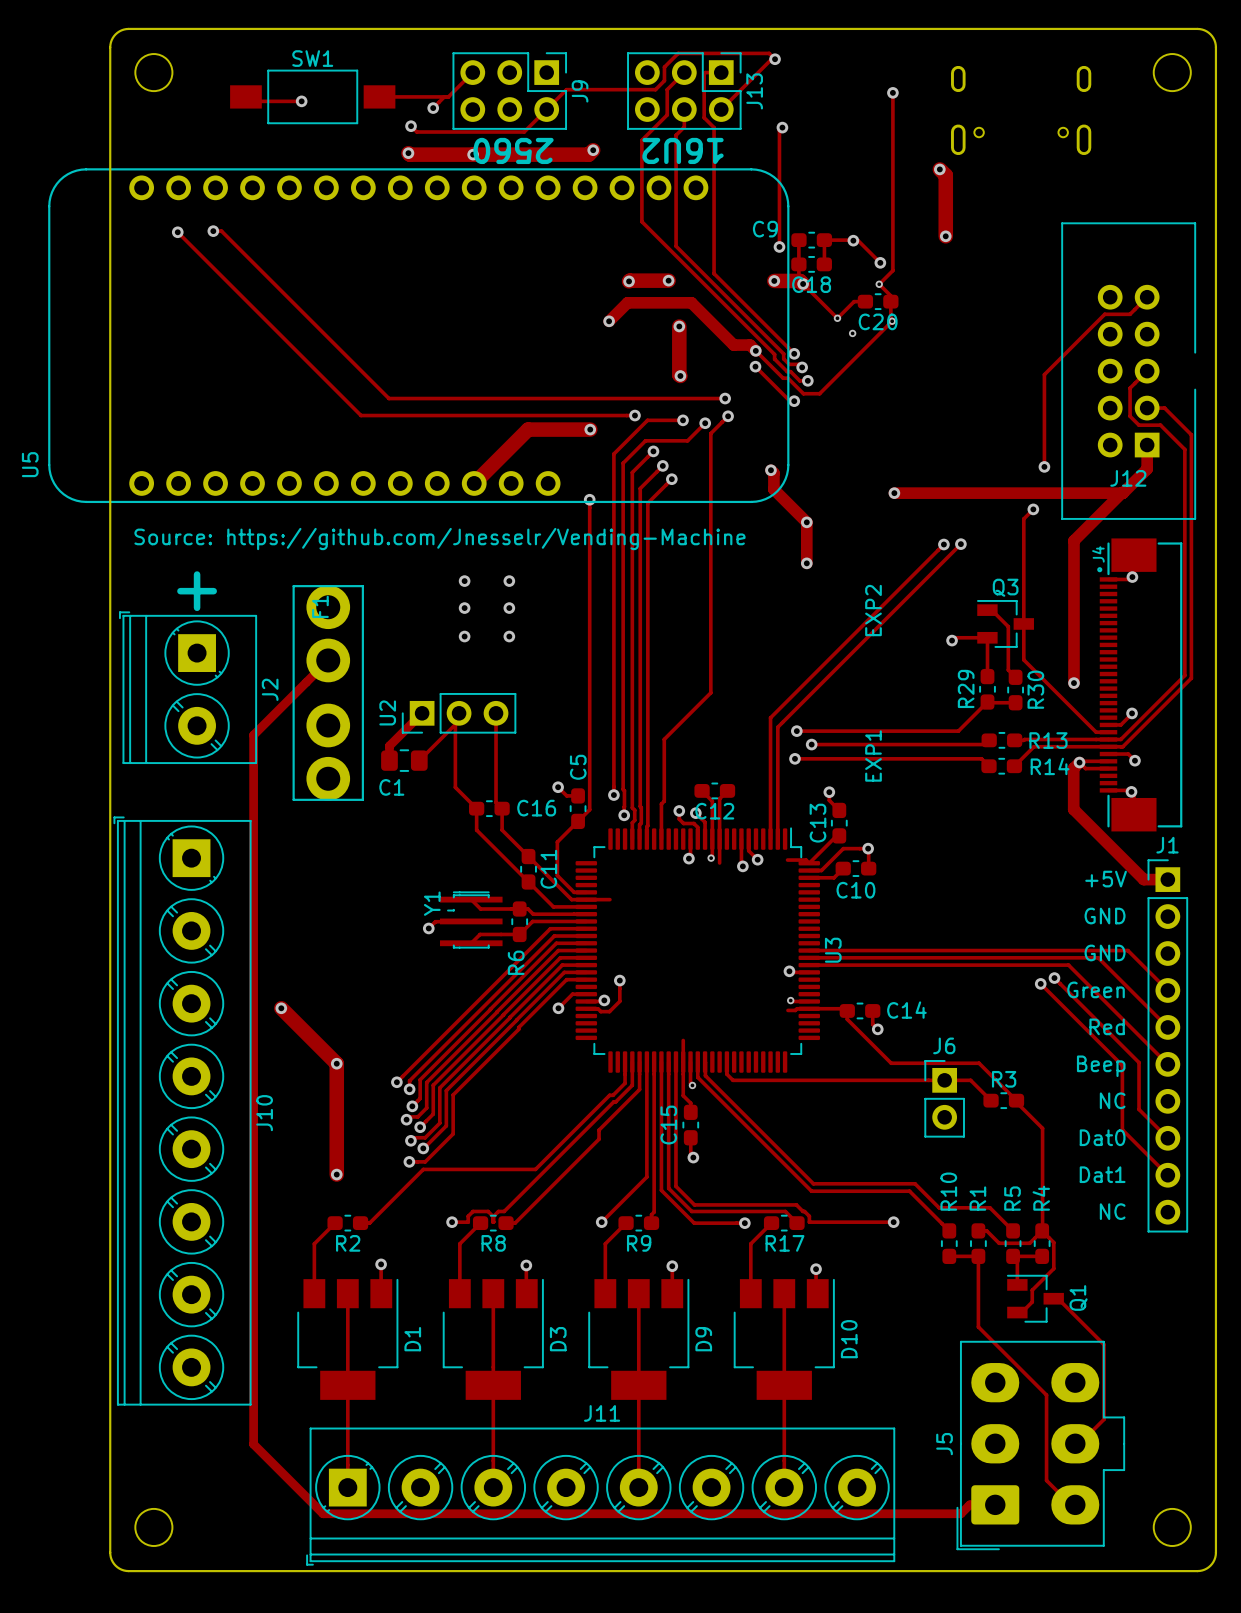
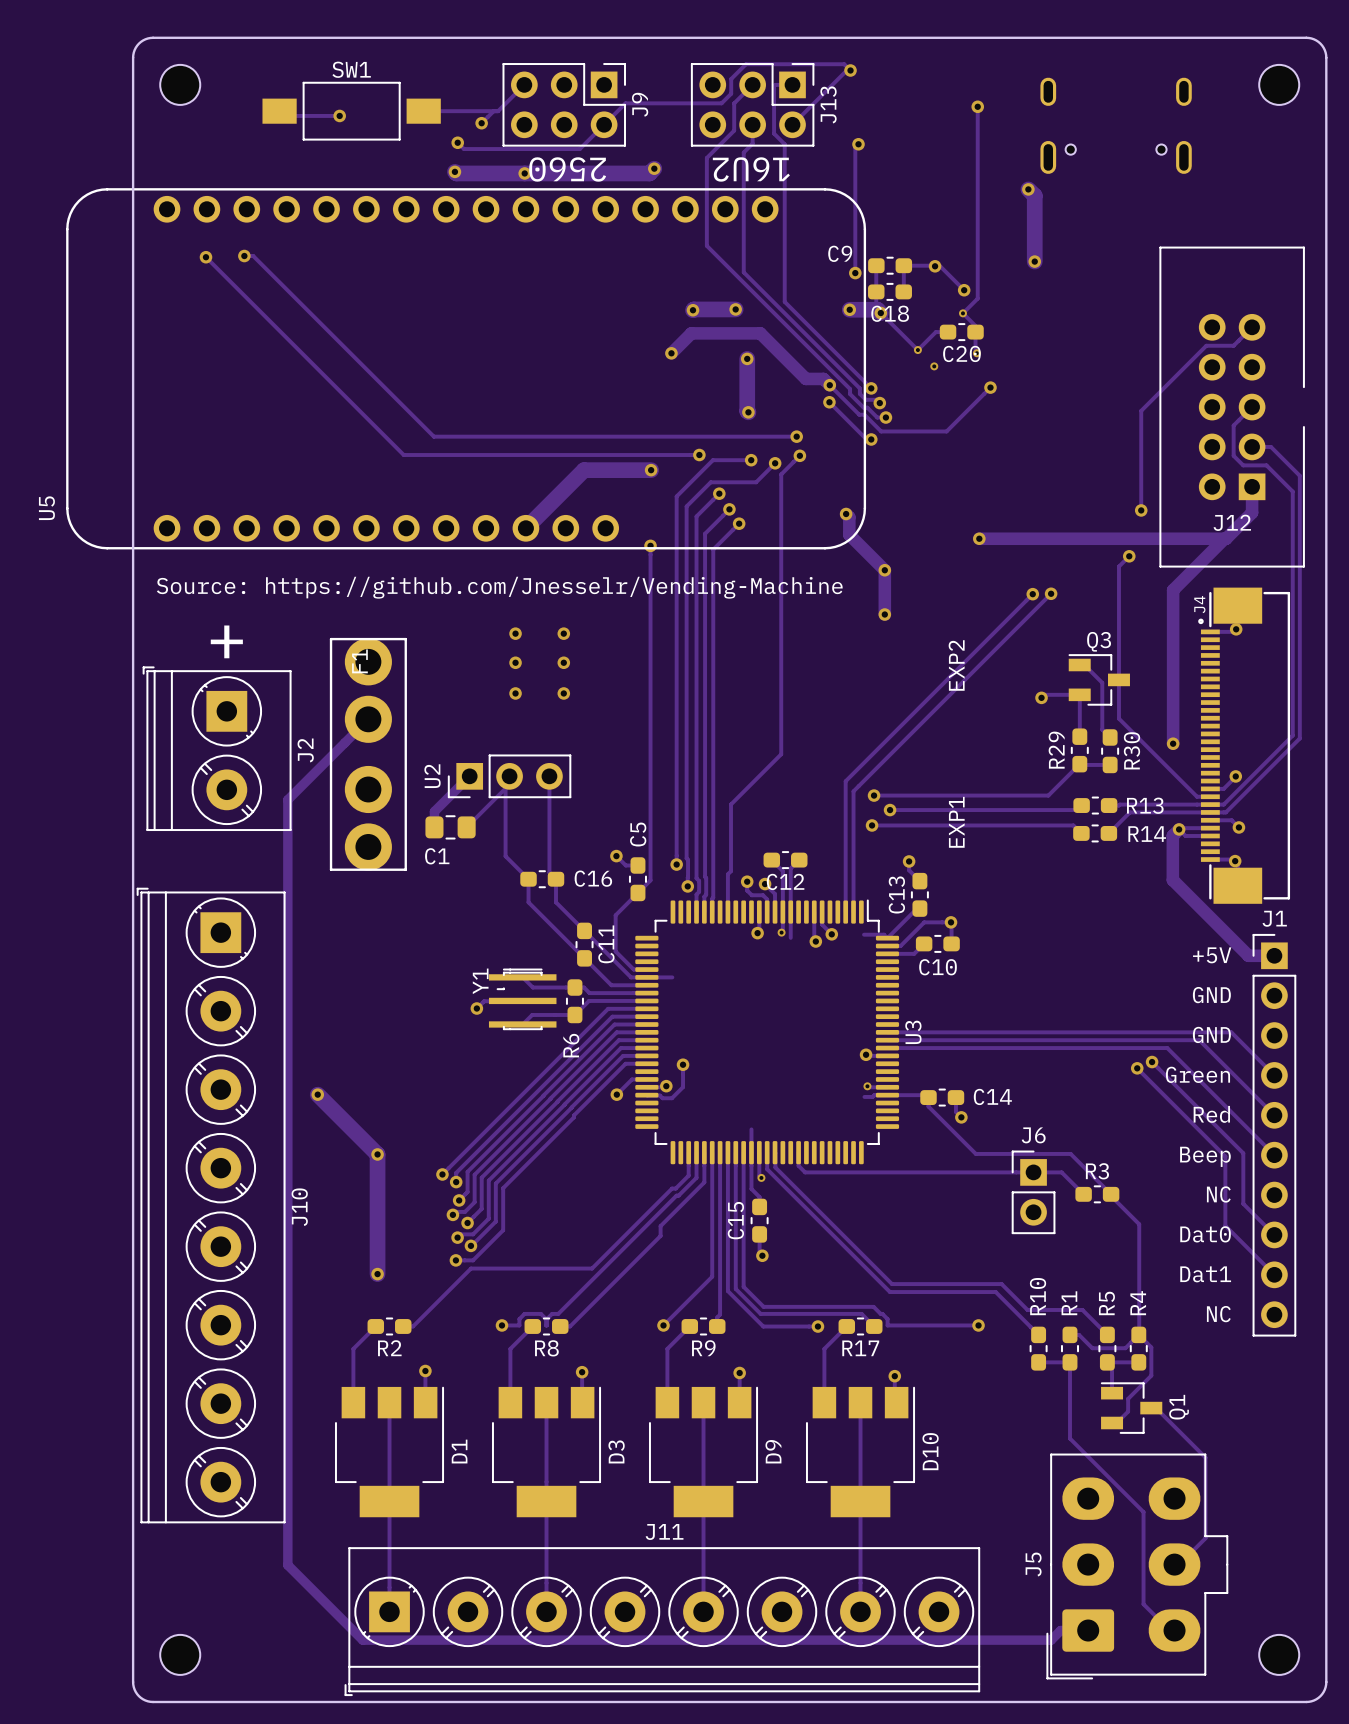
track: (890, 319) (892, 321) (819, 393) -> (990, 387) (946, 431) (898, 431)
via: none -> (990, 387)

